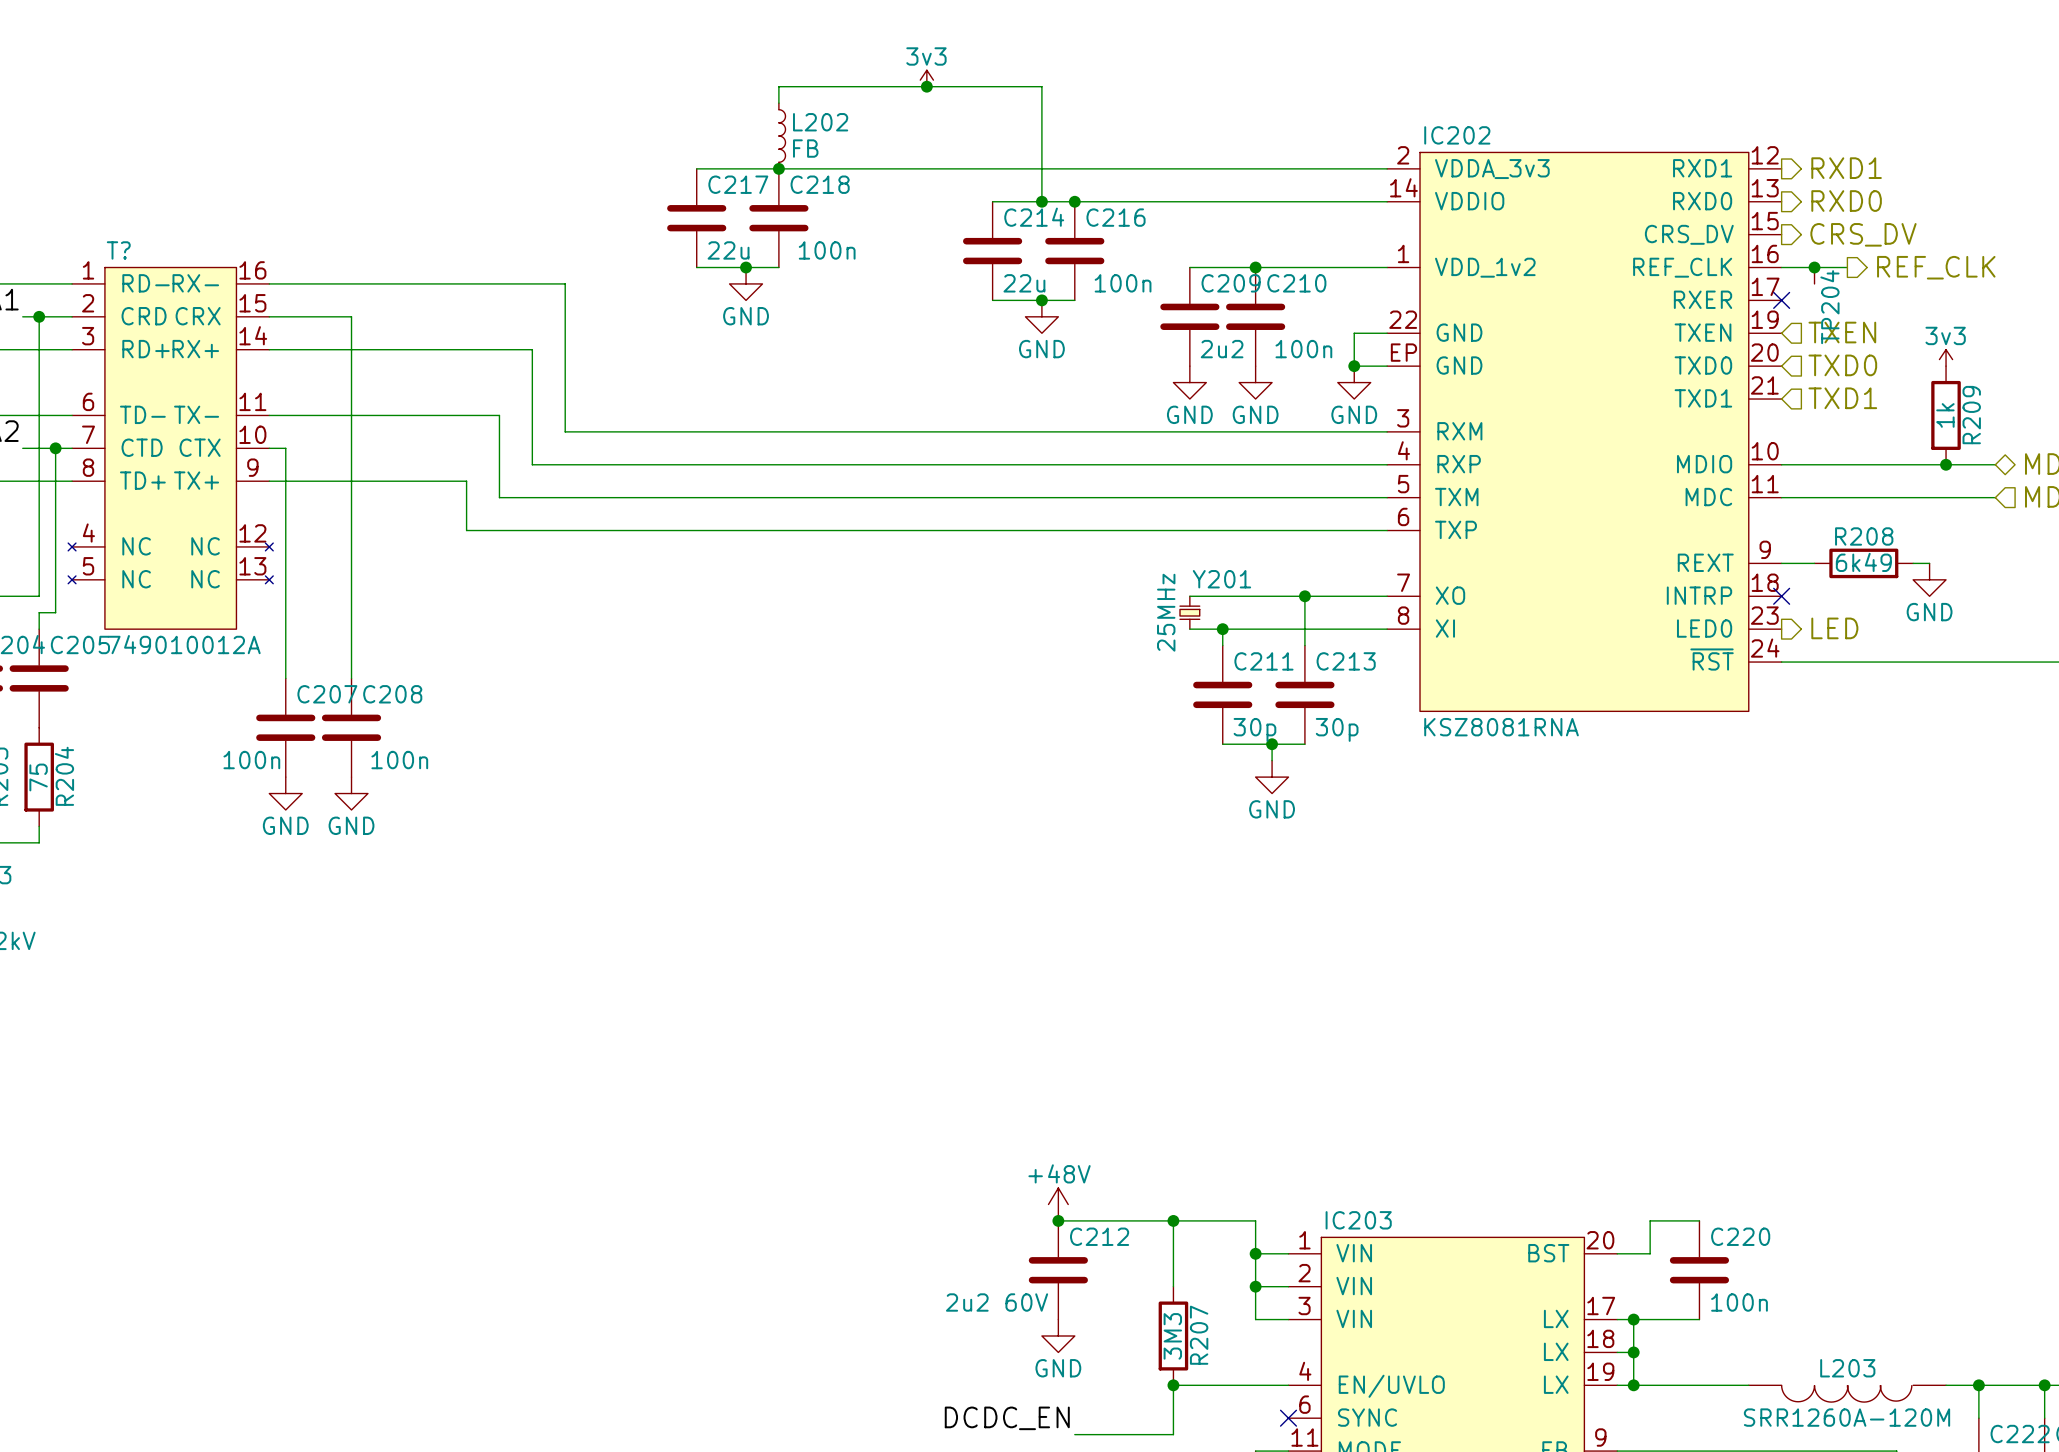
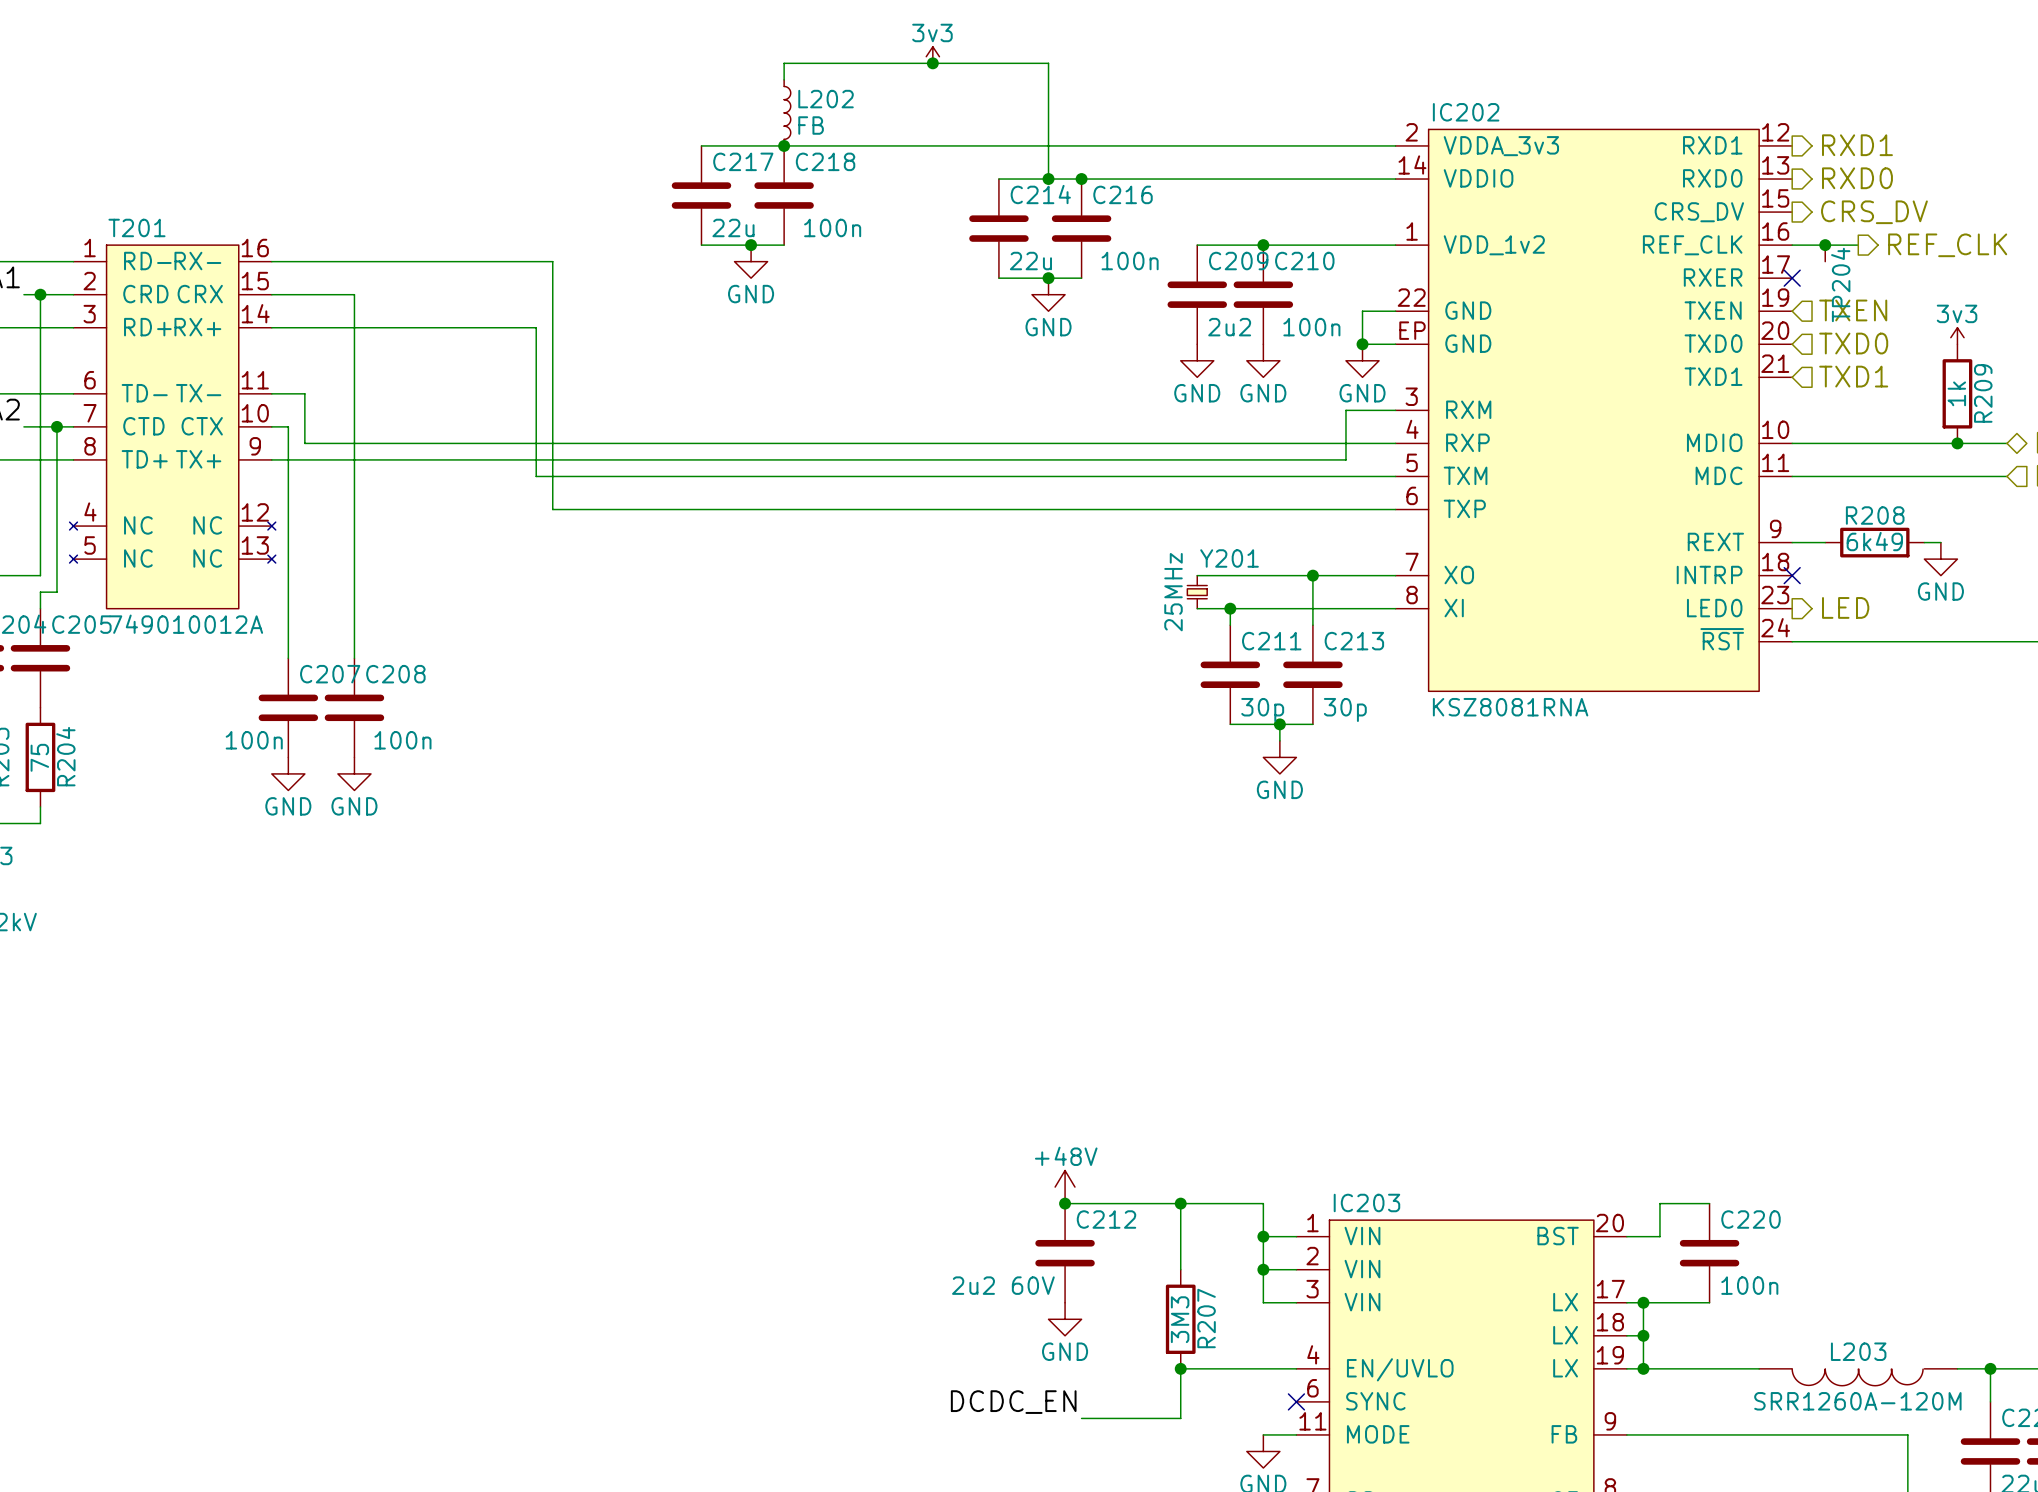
T? name: T? (118, 250) -> T201 (136, 227)
wire: (548, 283) (565, 283) (565, 431) (1337, 431) -> (470, 459) (1345, 459) (1345, 410)
wire: (302, 415) (499, 415) (499, 497) (532, 497) -> (304, 393) (304, 443) (536, 443) (536, 476)
wire: (466, 481) (466, 530) (548, 530) -> (552, 261) (552, 509)

